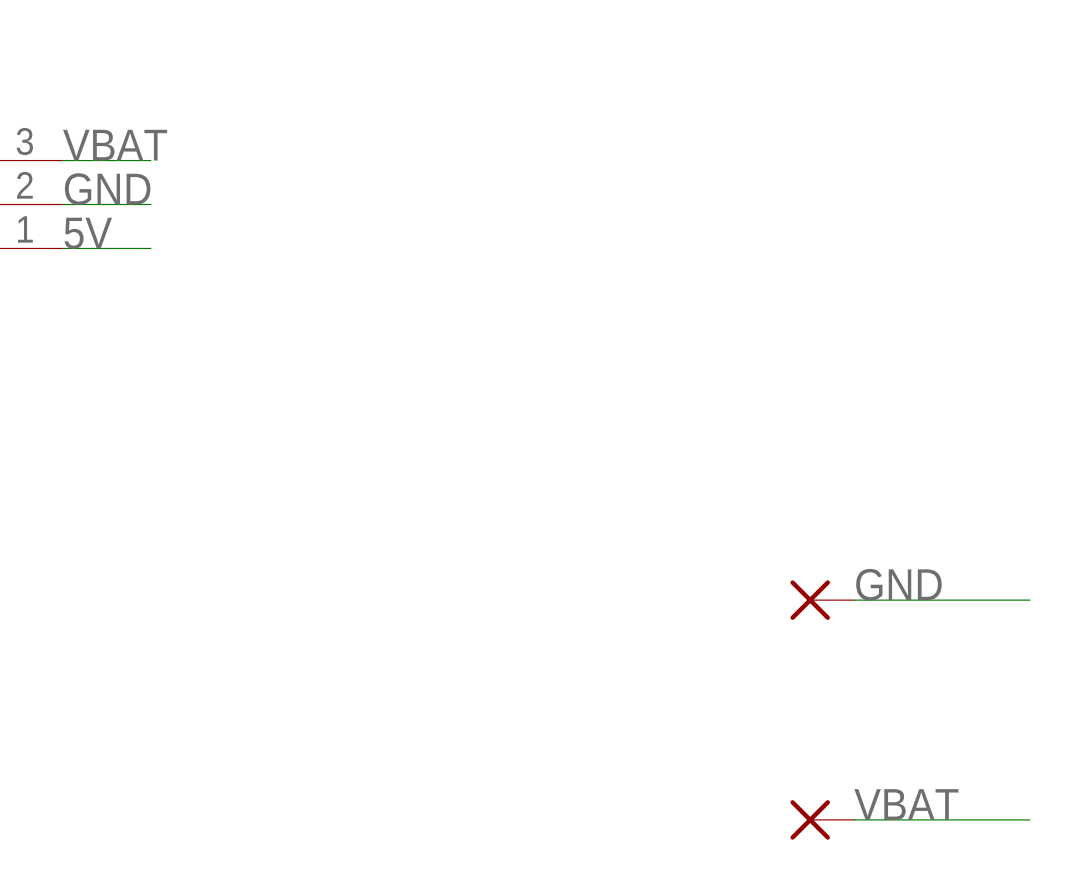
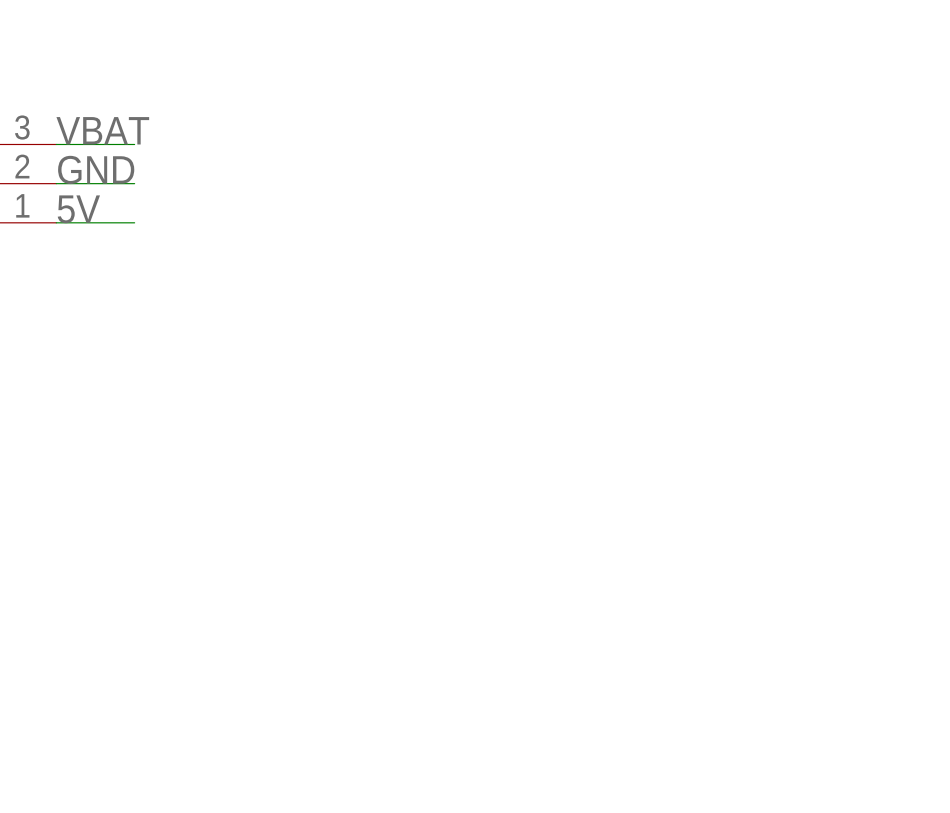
label: GND (898, 584) -> none
part: (822, 600) -> none
wire: (854, 600) (1029, 600) -> none
label: VBAT (906, 804) -> none
part: (822, 819) -> none
wire: (854, 819) (1029, 819) -> none

